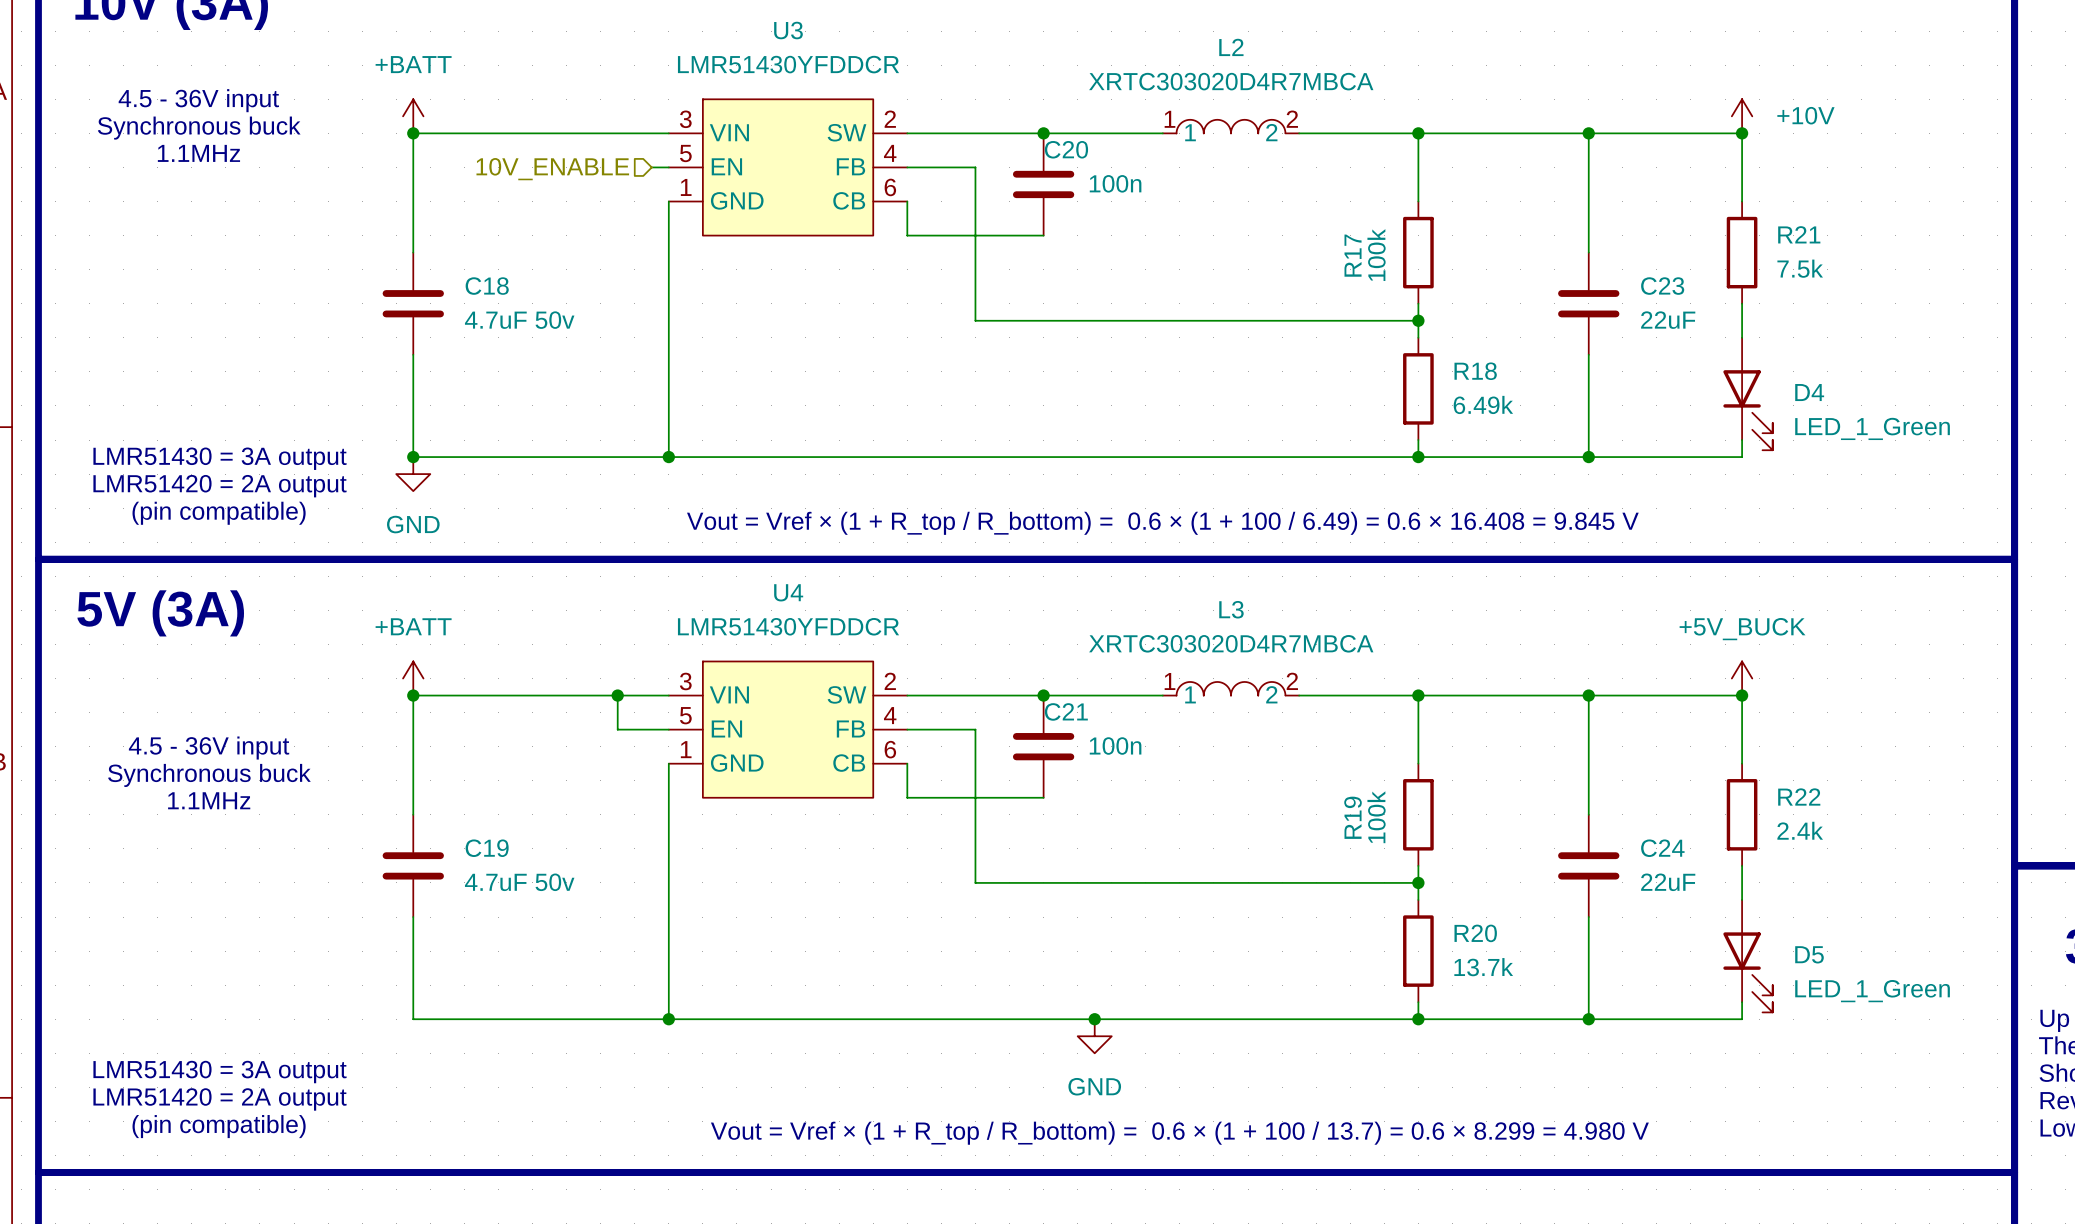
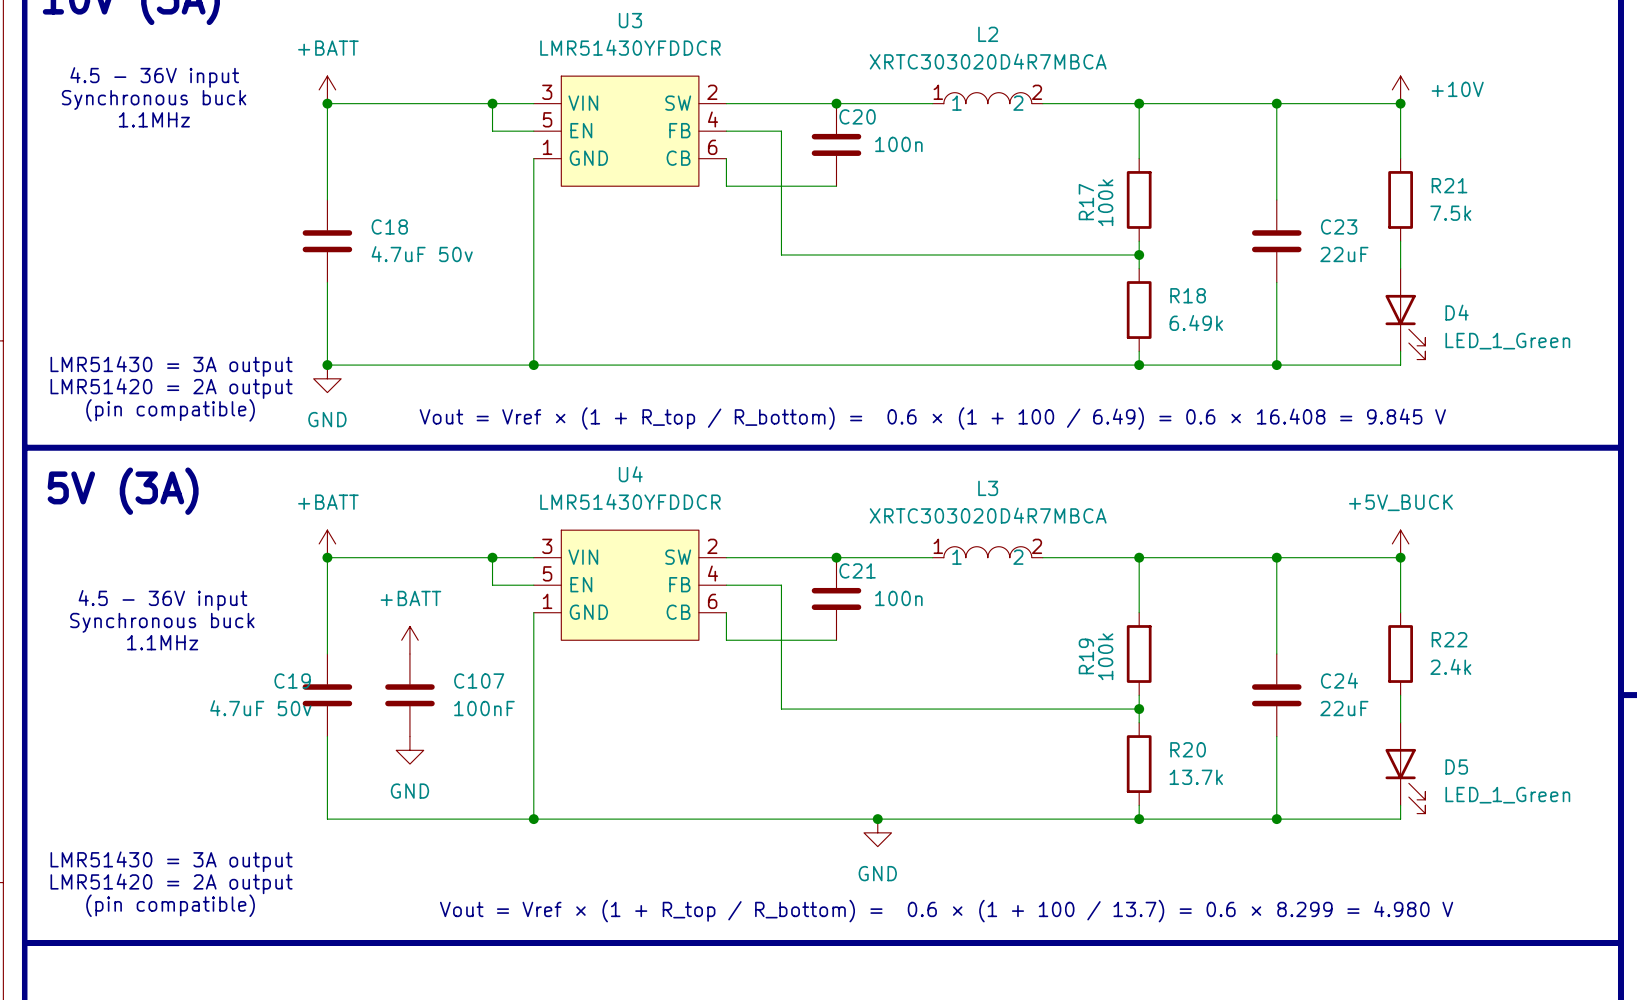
wire: none -> (492, 103) (492, 131) (520, 131)
junction: none -> (492, 103)
hierarchical label: 10V_ENABLE (552, 169) -> none
power symbol: none -> +BATT (409, 640)
C19 name position: C19 (487, 848) -> C19 (292, 681)
C107: none -> 100nF (409, 695)
C19 value position: 4.7uF 50v (519, 882) -> 4.7uF 50v (260, 708)
power symbol: none -> GND (409, 750)

